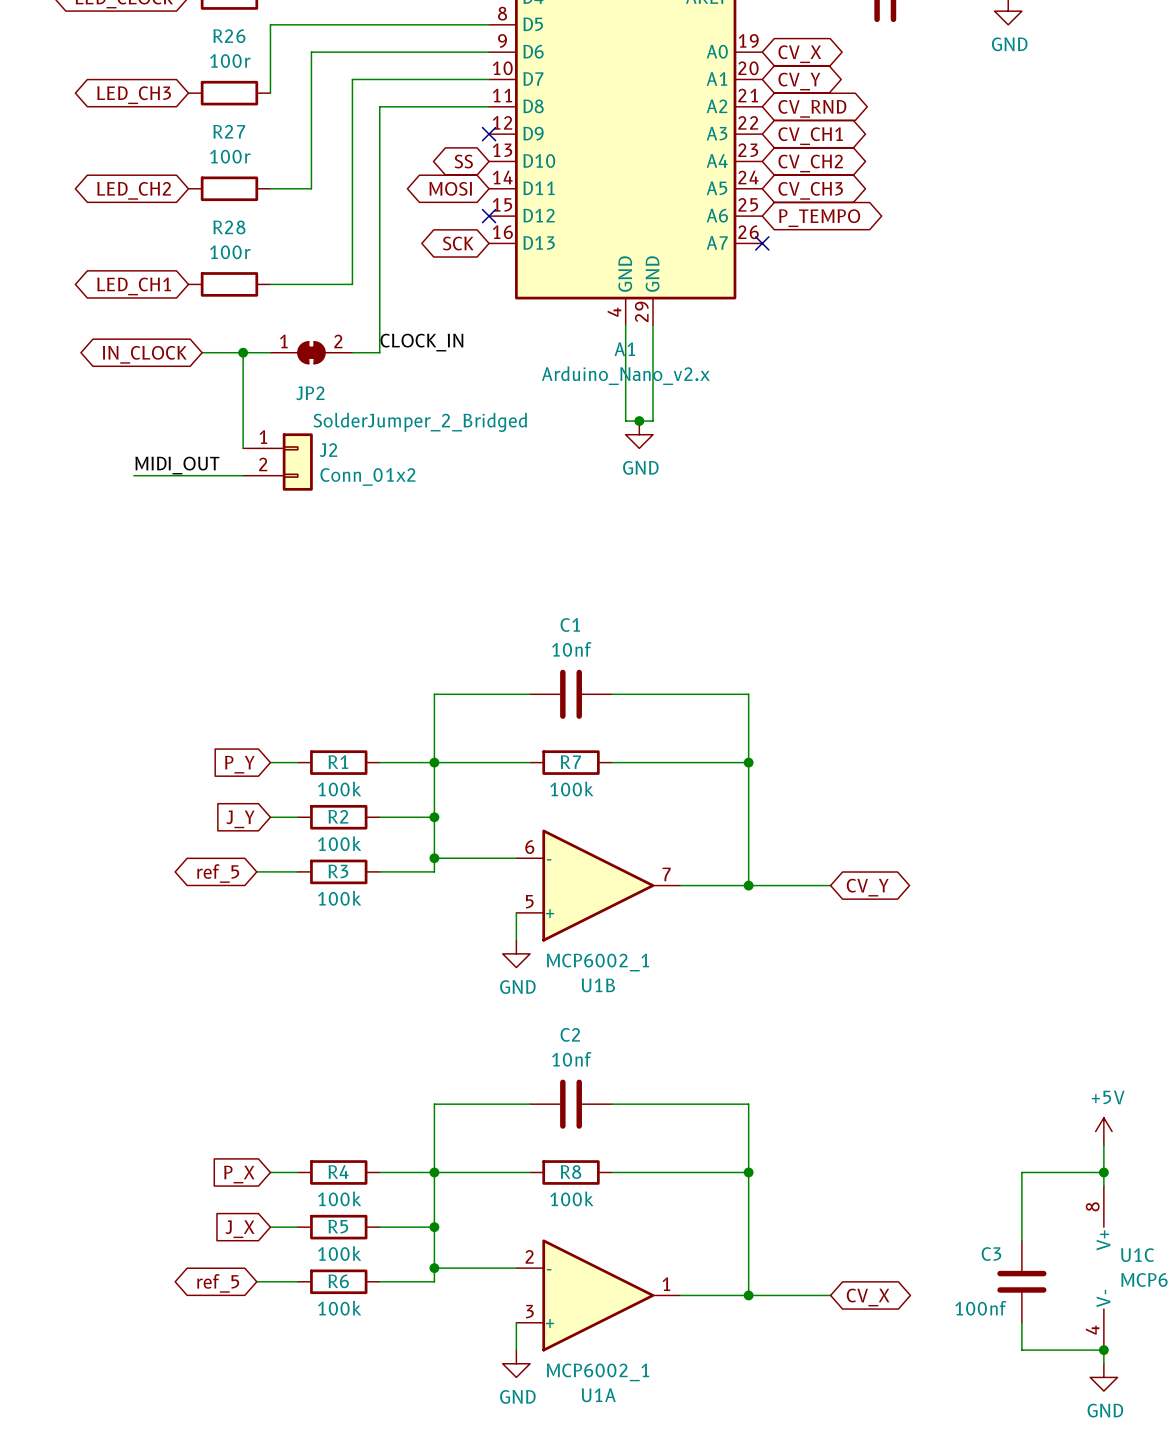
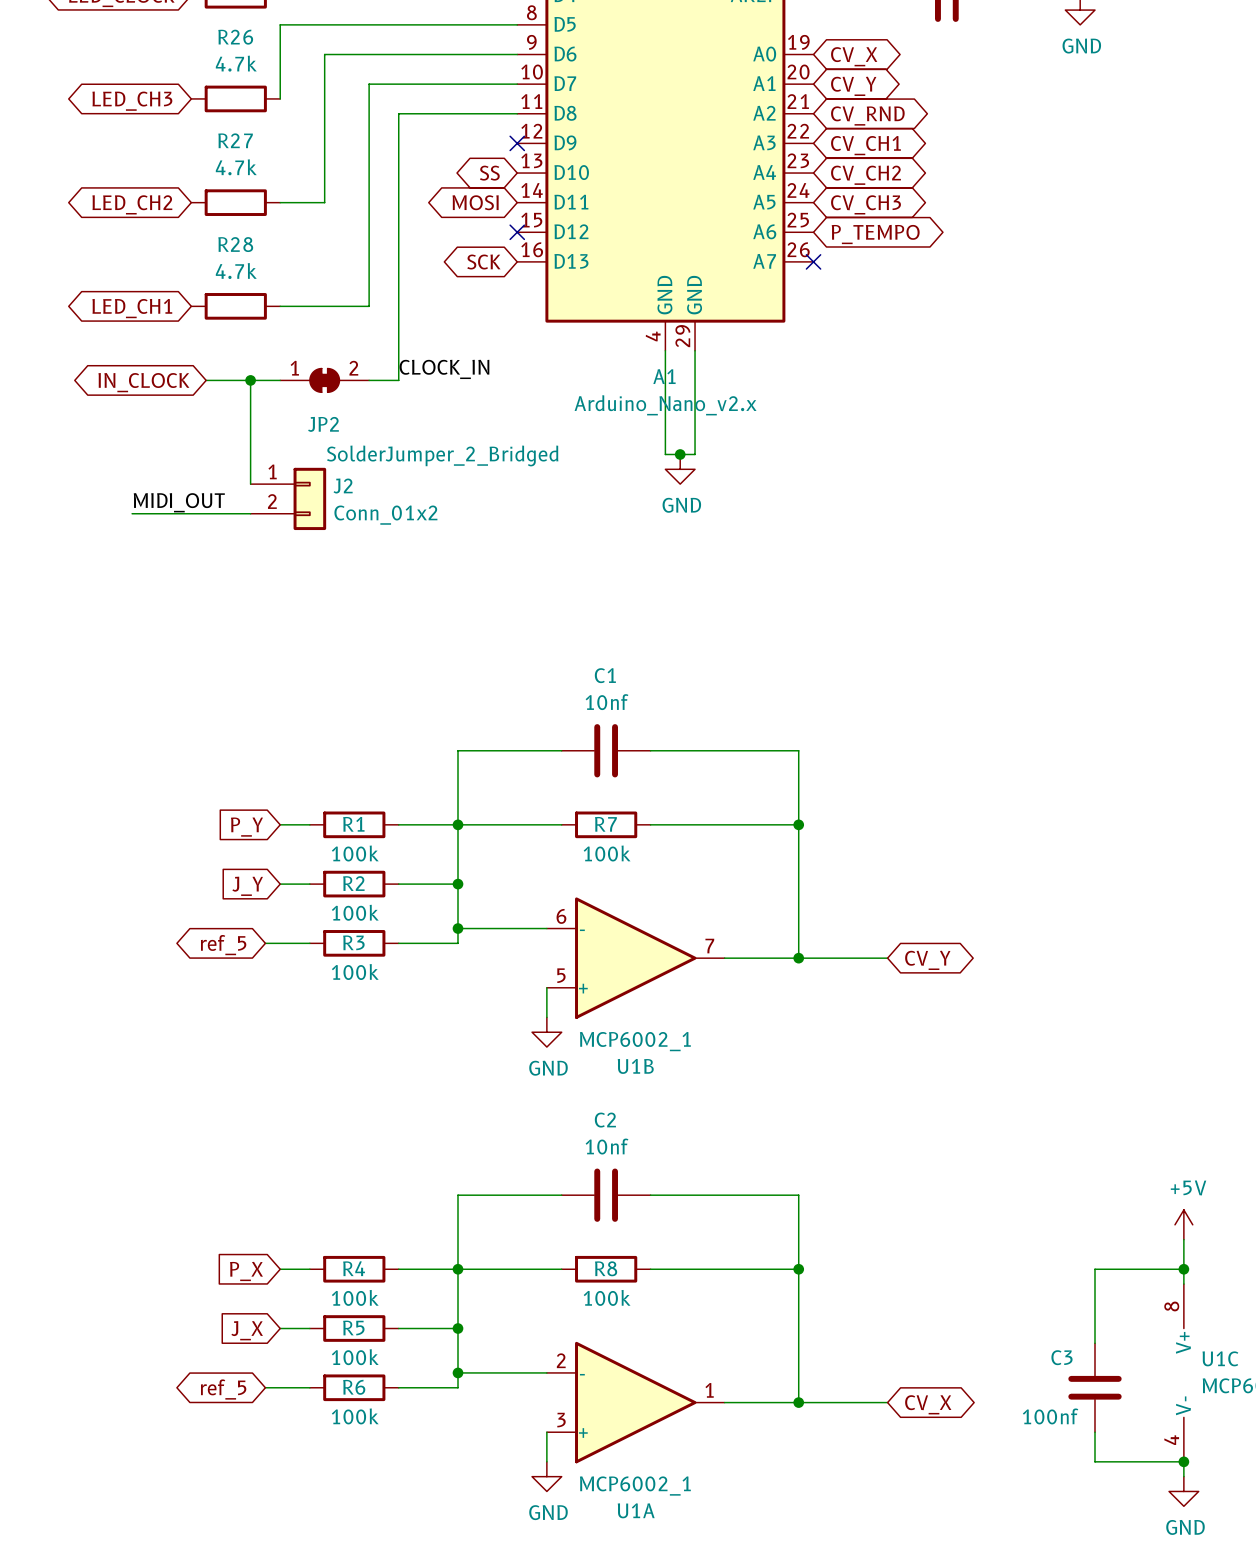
R26 value: 100r (230, 61) -> 4.7k (236, 63)
R27 value: 100r (230, 156) -> 4.7k (236, 167)
R28 value: 100r (230, 252) -> 4.7k (236, 271)

